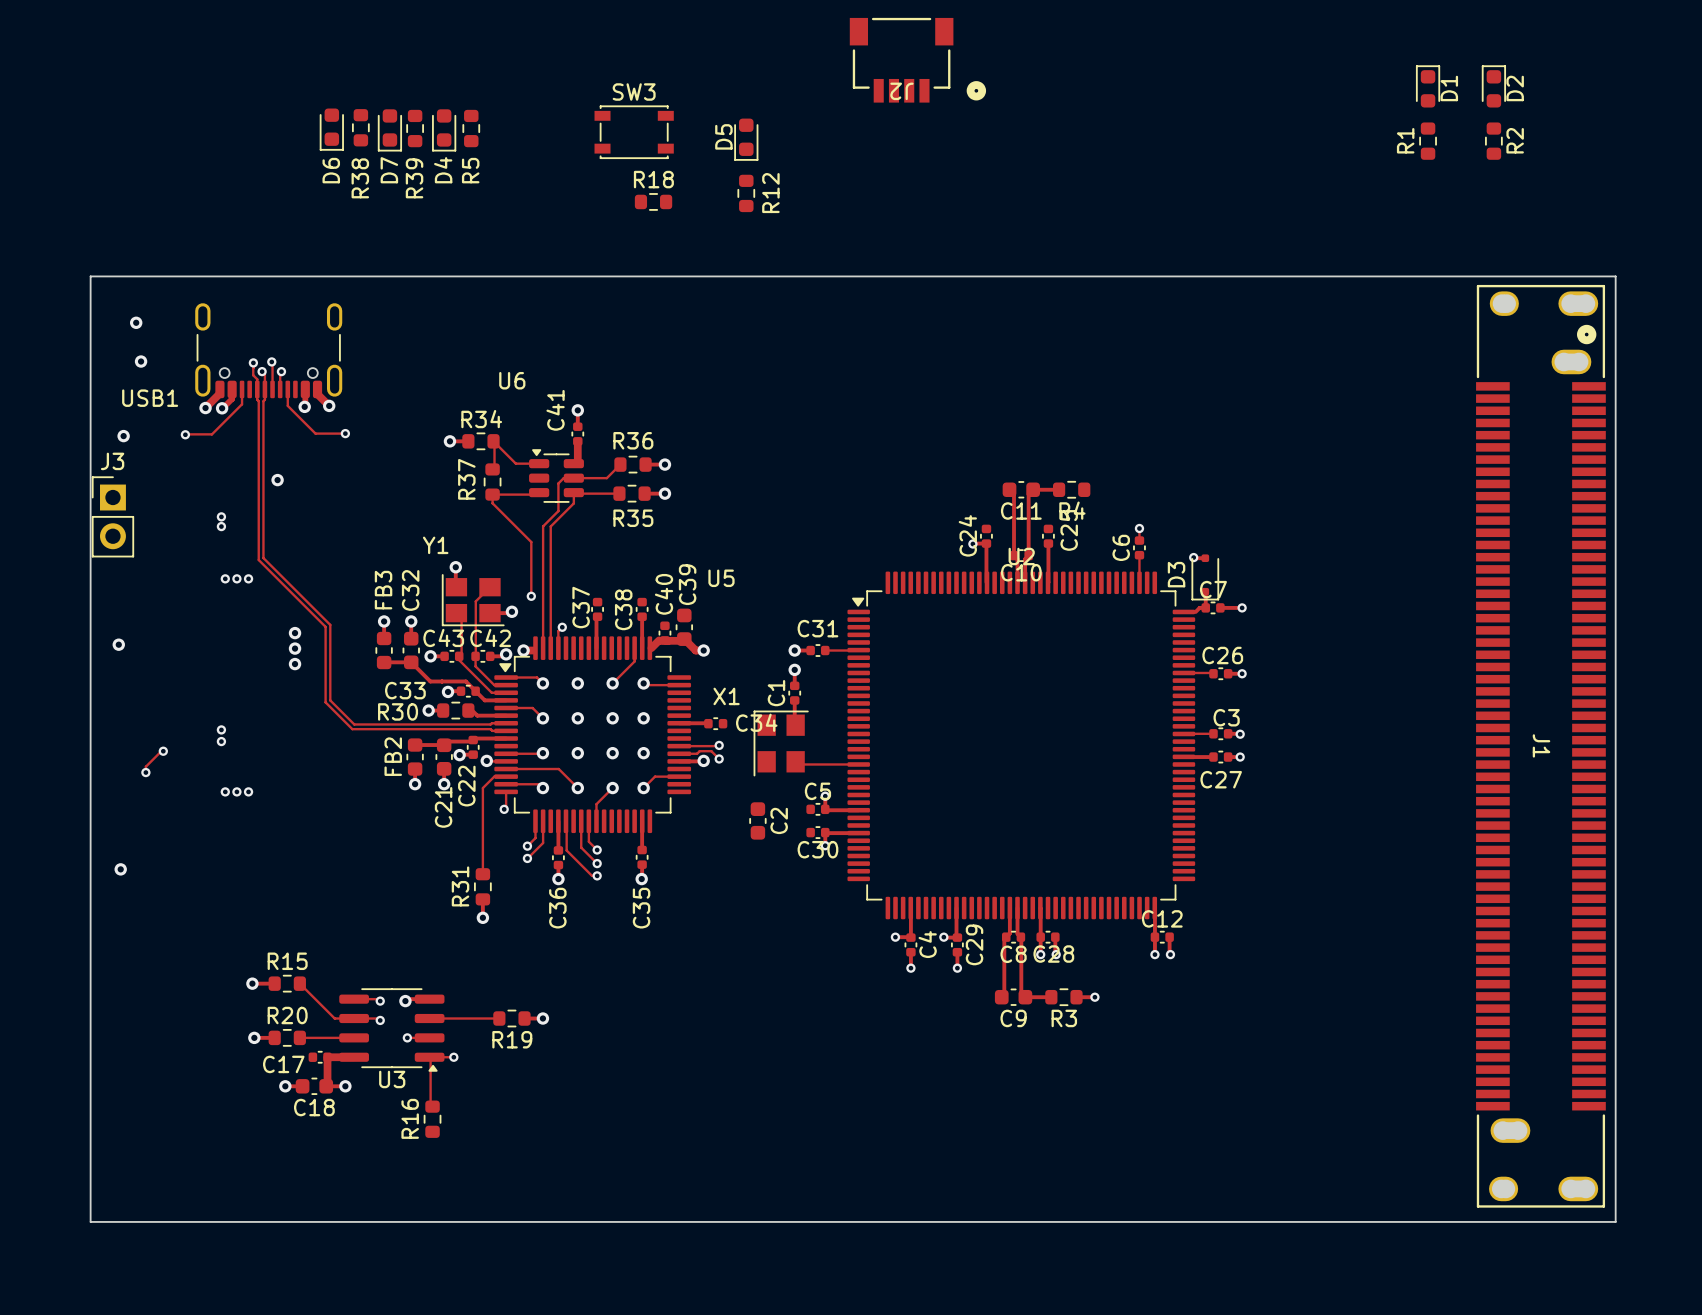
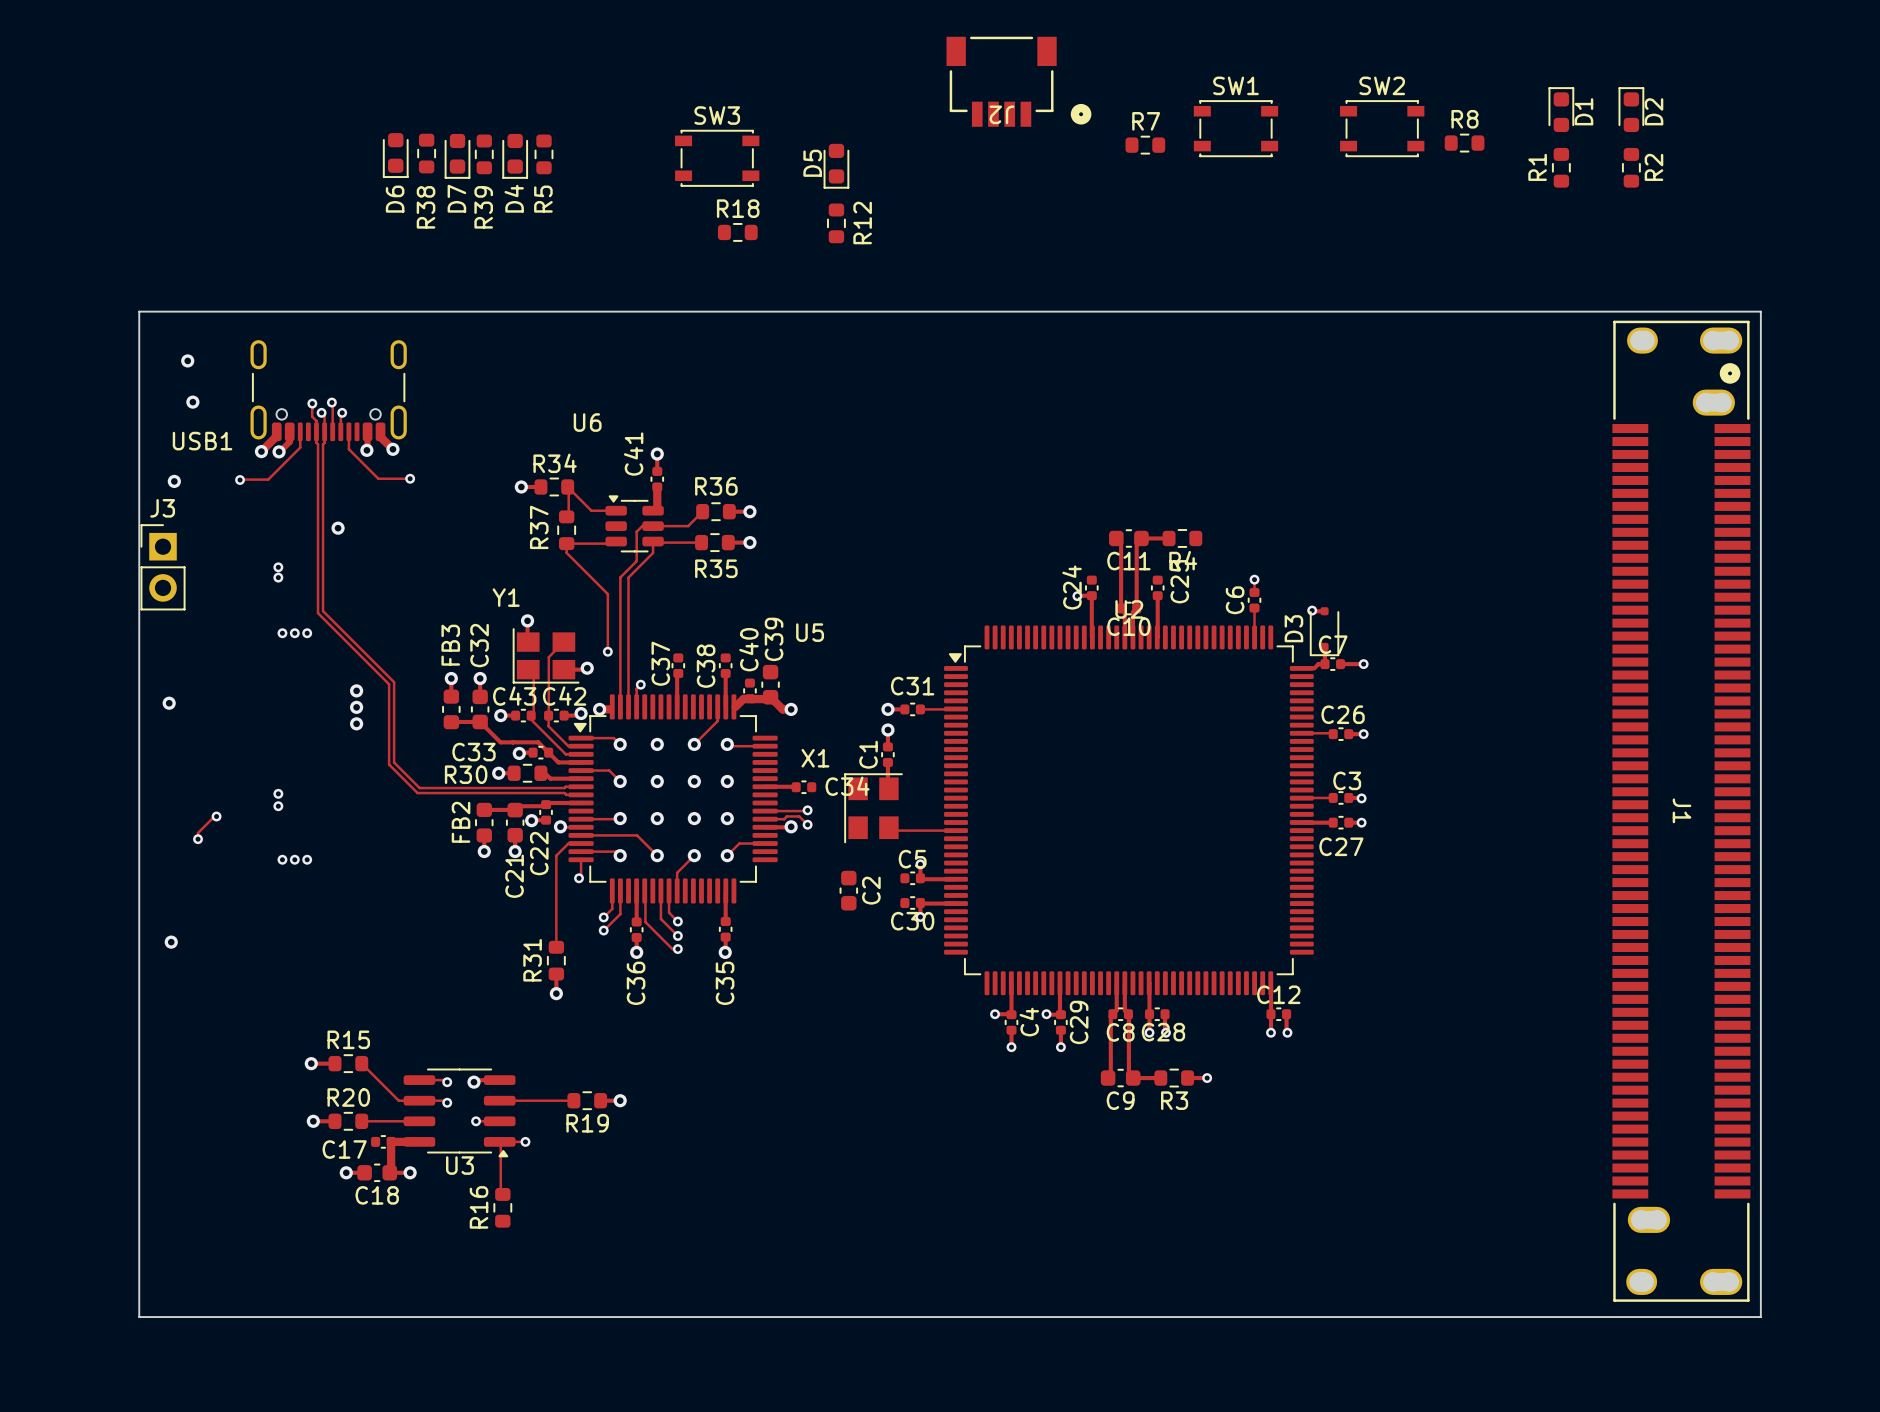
SW1: none -> (1235, 128)
SW2: none -> (1382, 128)
R8: none -> (1464, 143)
R7: none -> (1145, 145)

